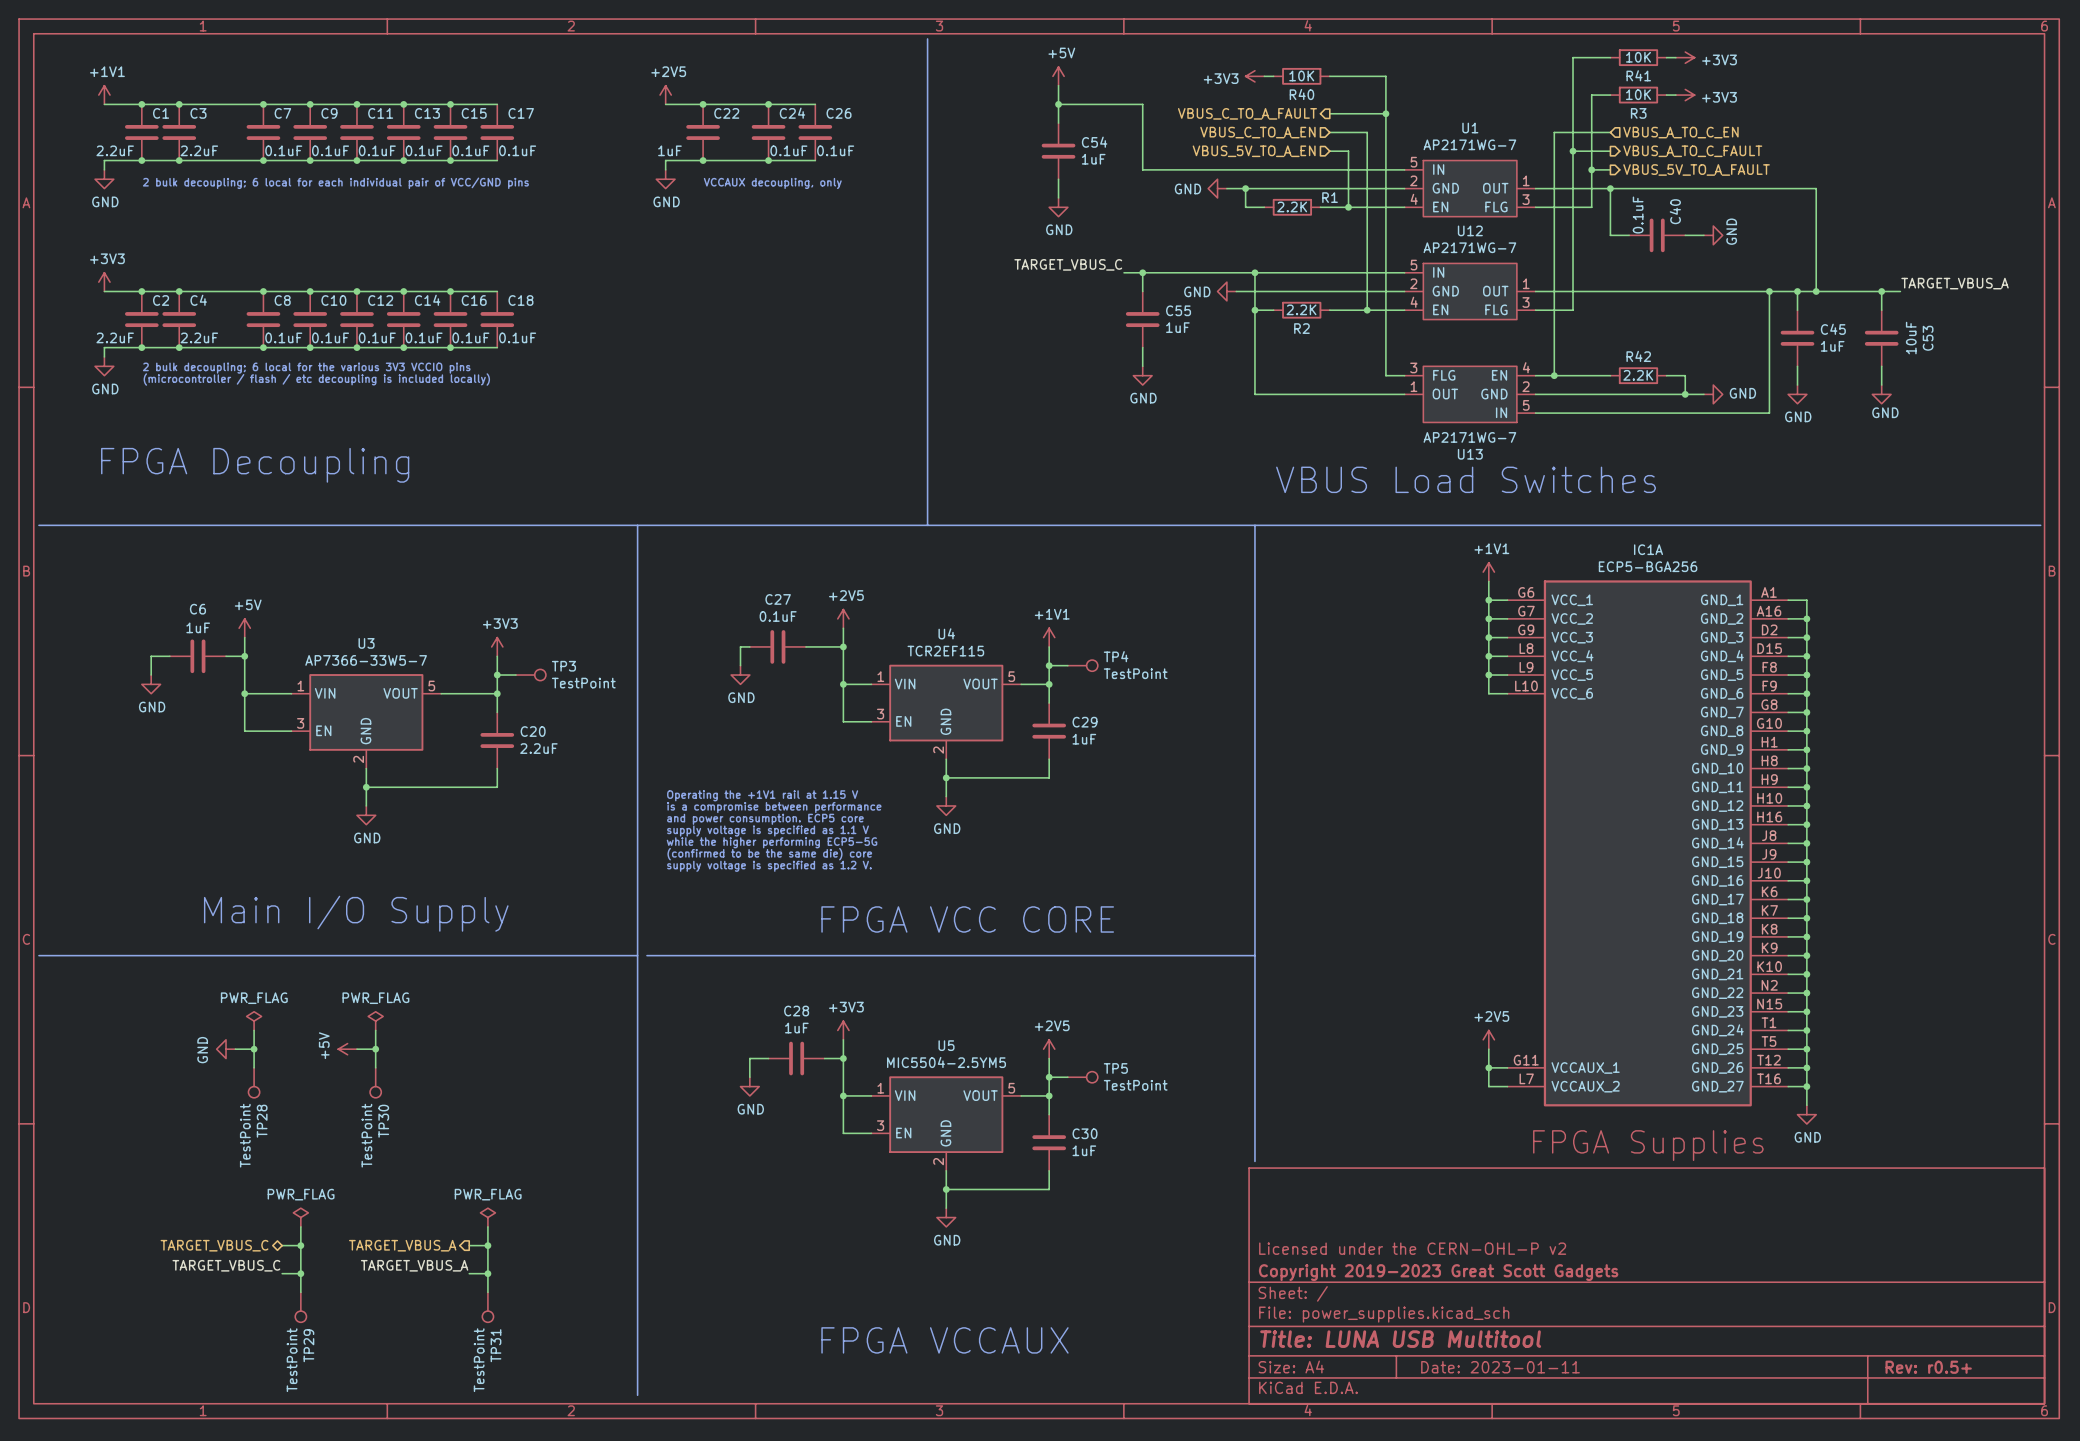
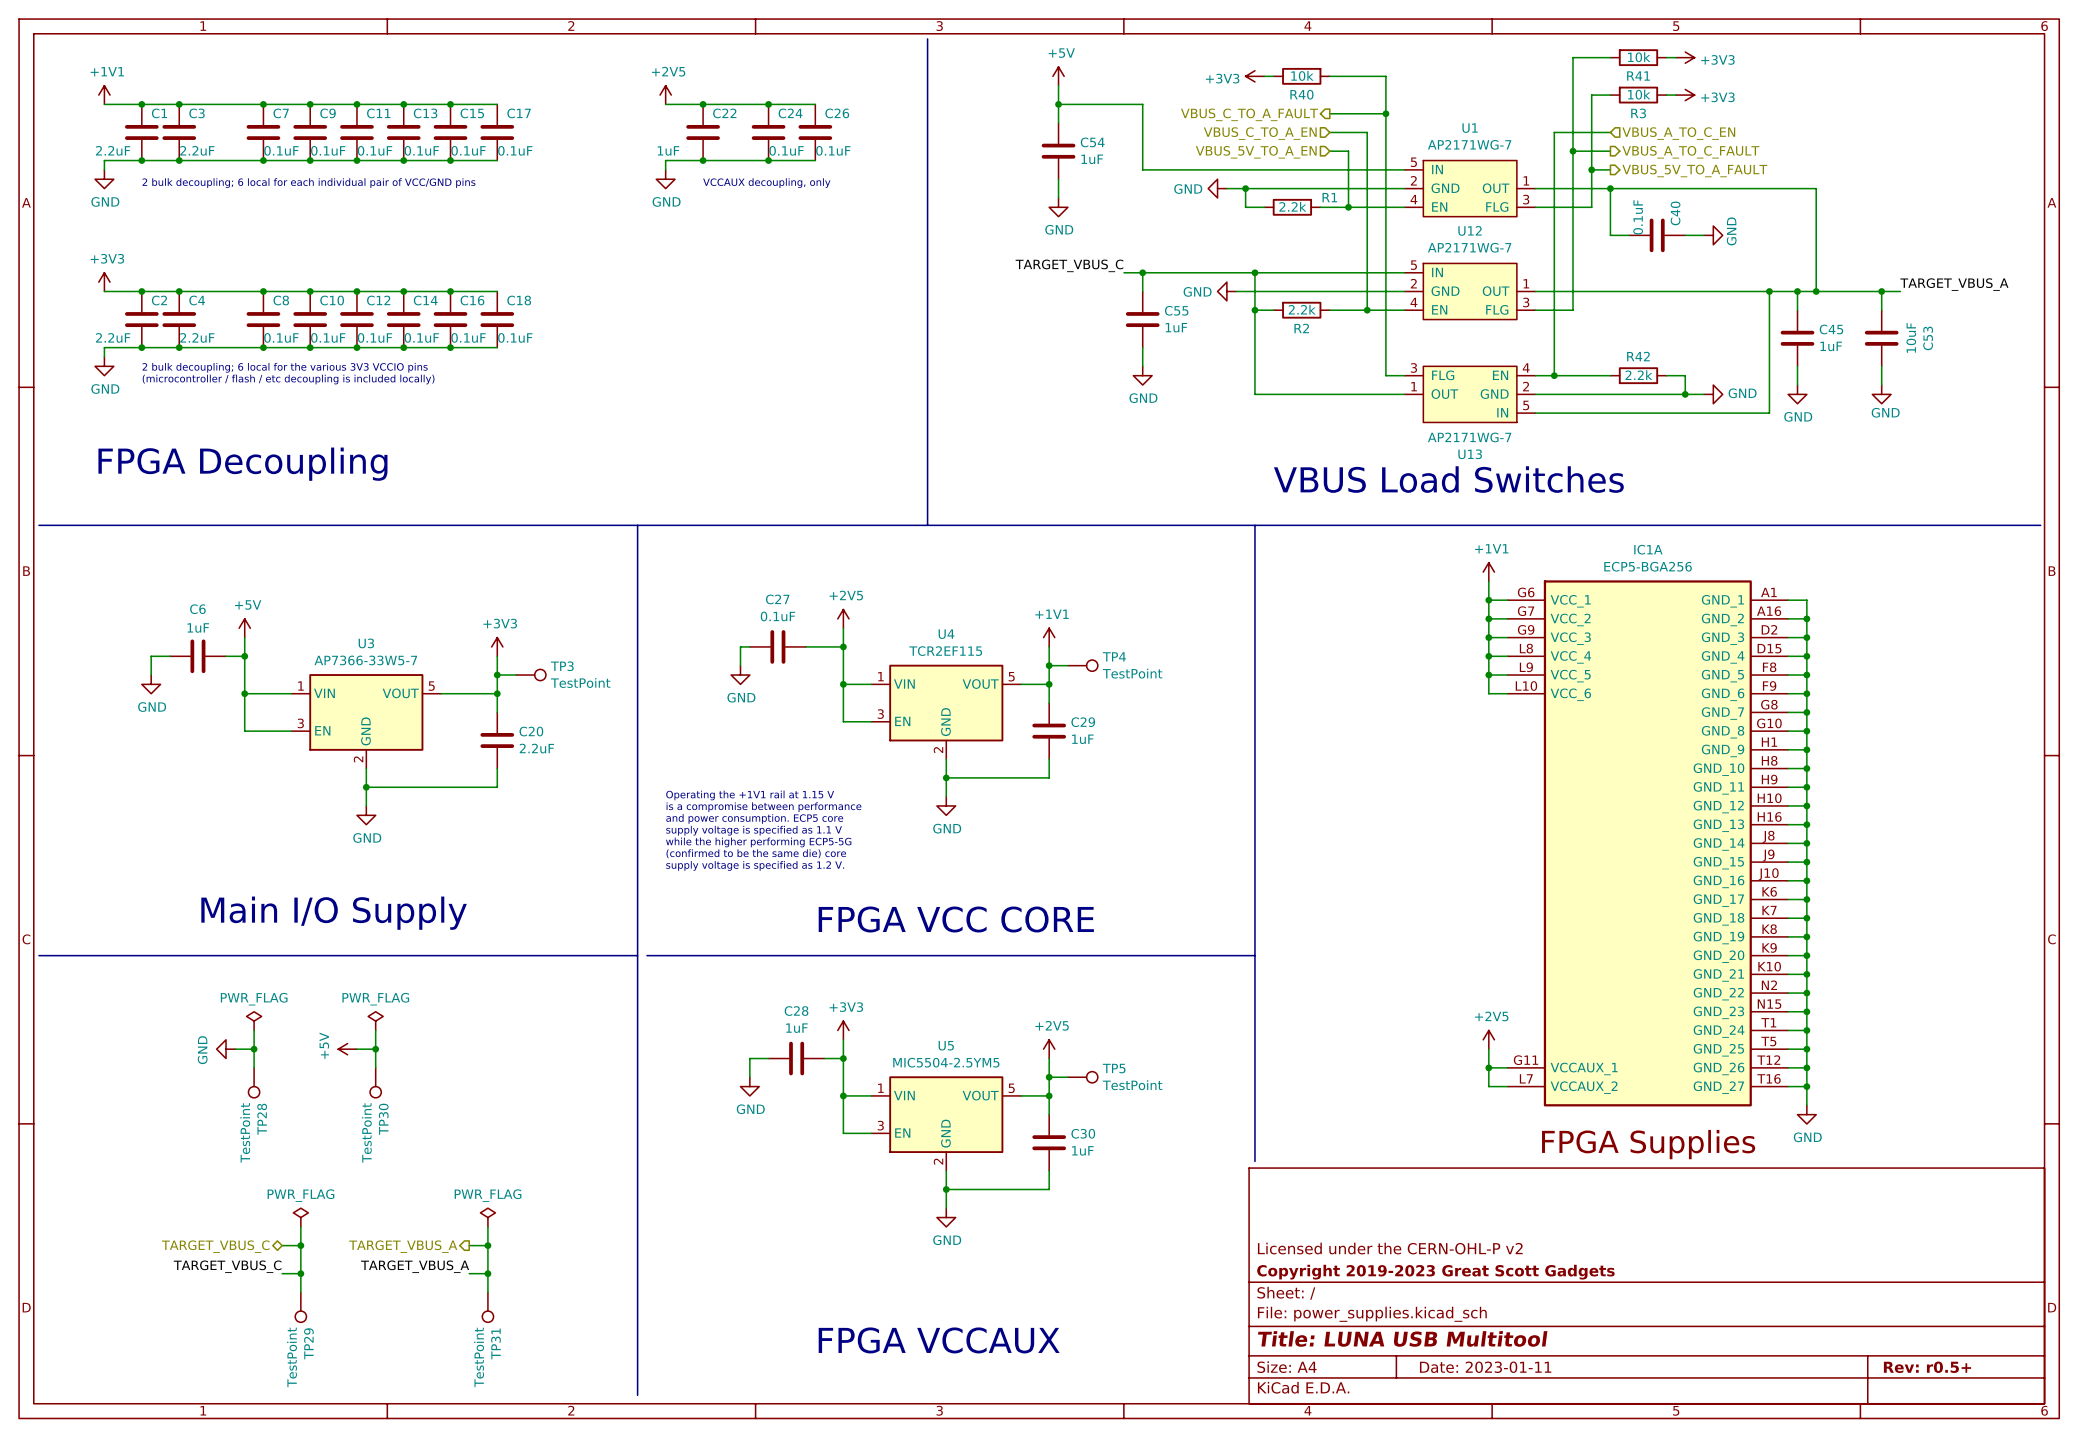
R41 value: 10K (1638, 57) -> 10k (1639, 57)
R40 value: 10K (1301, 76) -> 10k (1302, 75)
R3 value: 10K (1638, 94) -> 10k (1639, 94)
R1 value: 2.2K (1292, 206) -> 2.2k (1292, 206)
R2 value: 2.2K (1301, 309) -> 2.2k (1302, 309)
R42 value: 2.2K (1638, 375) -> 2.2k (1638, 375)

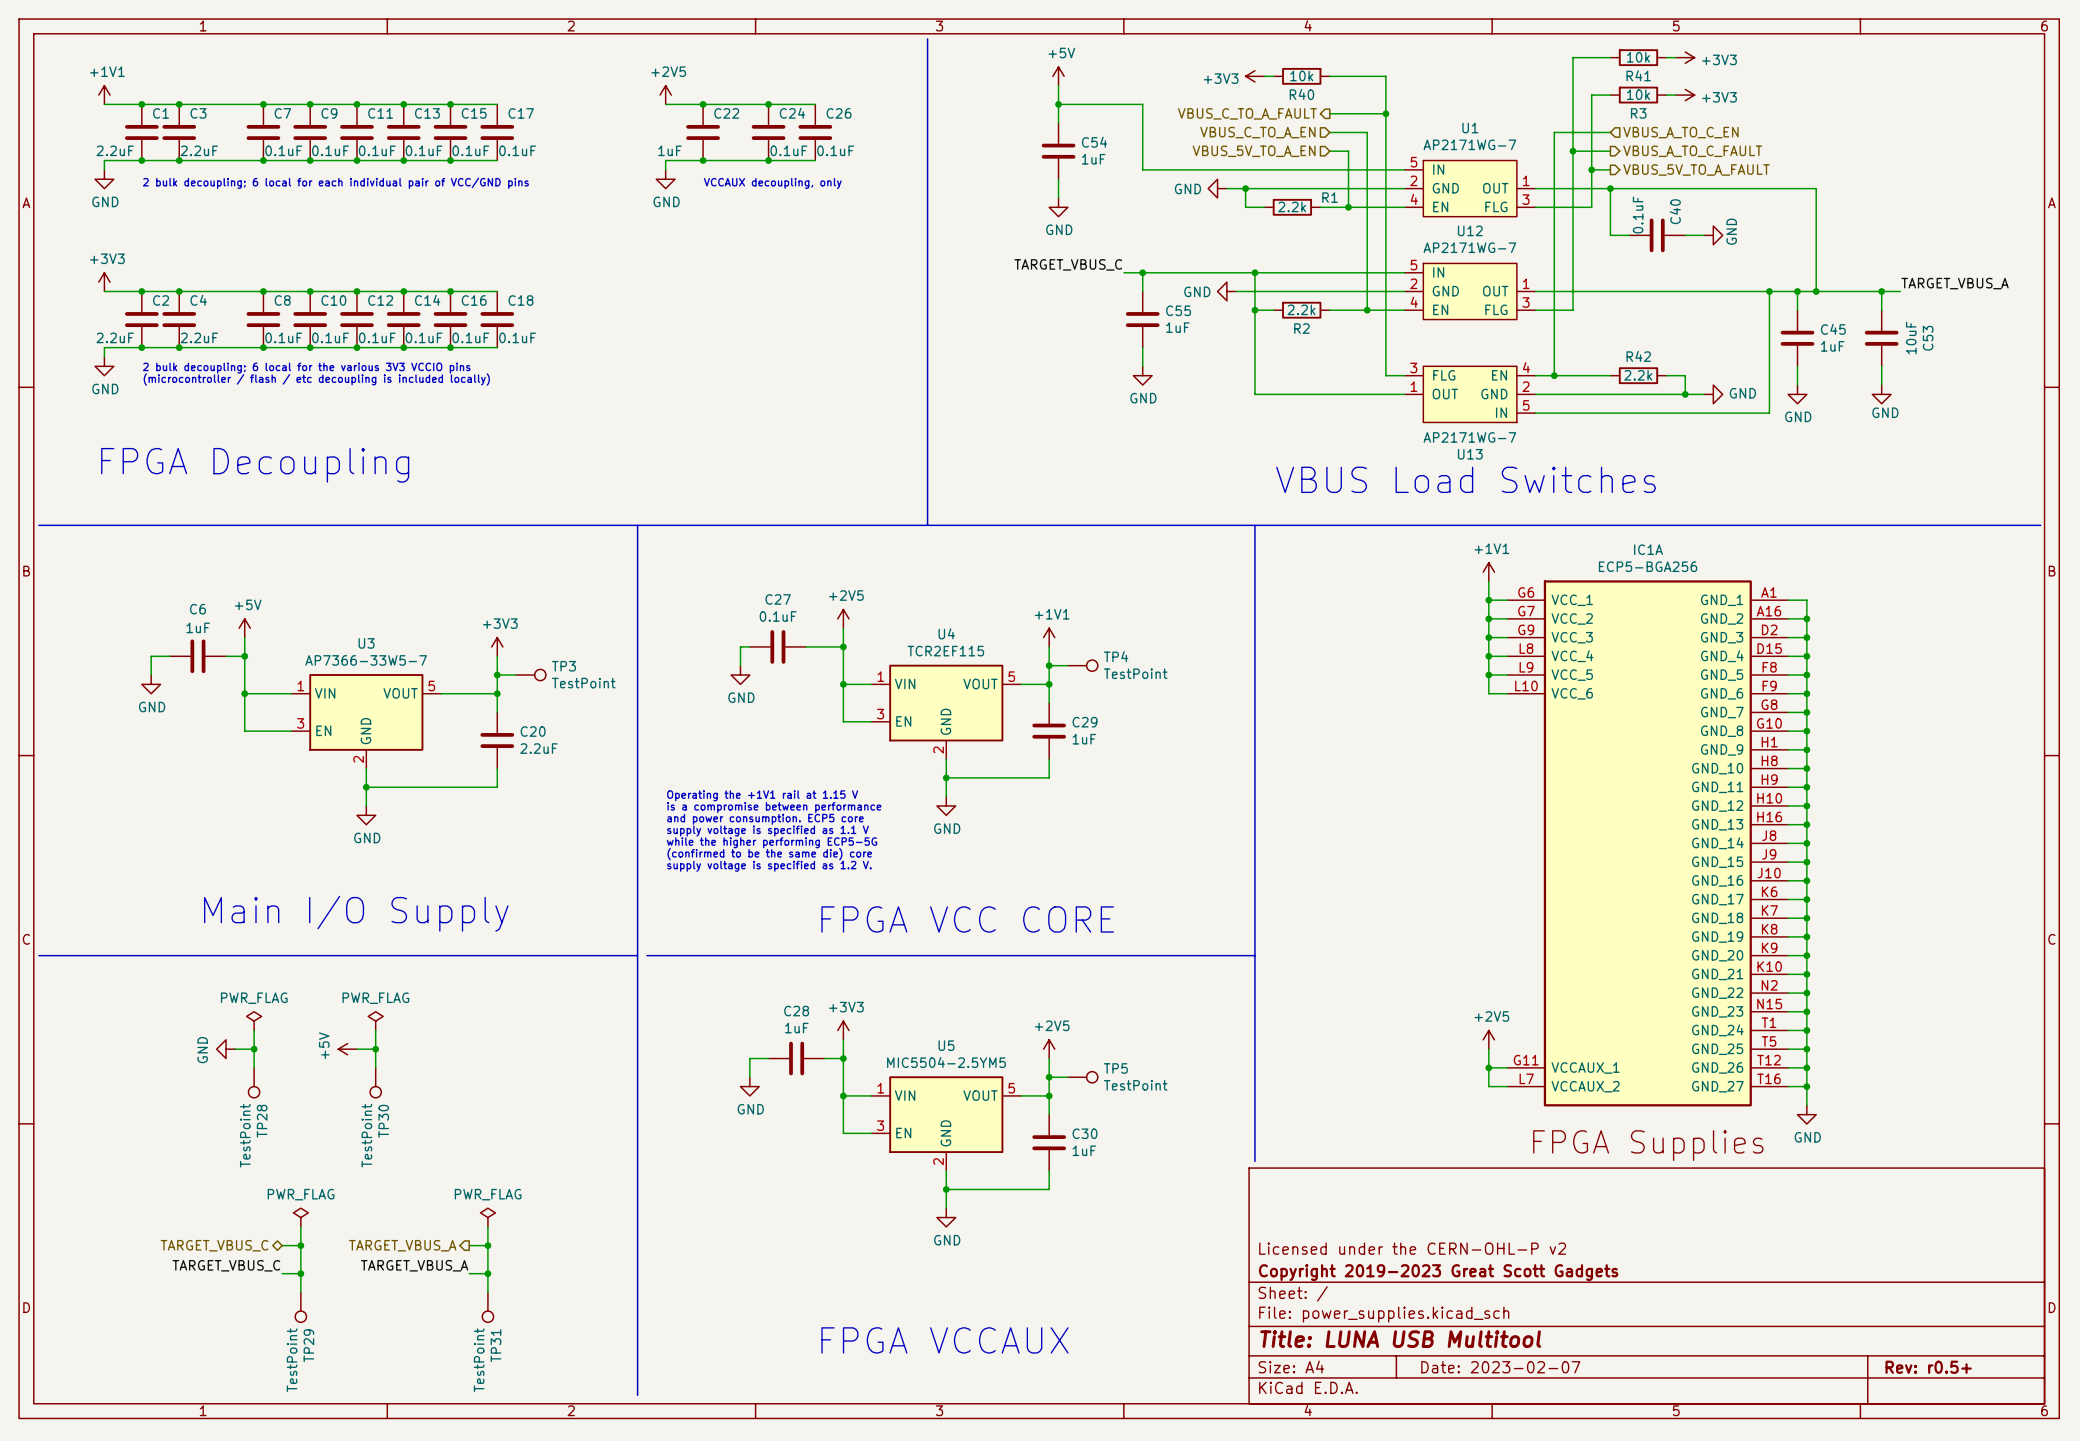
title block: Date: 2023-01-11 (1485, 1367) -> Date: 2023-02-07 (1500, 1367)

